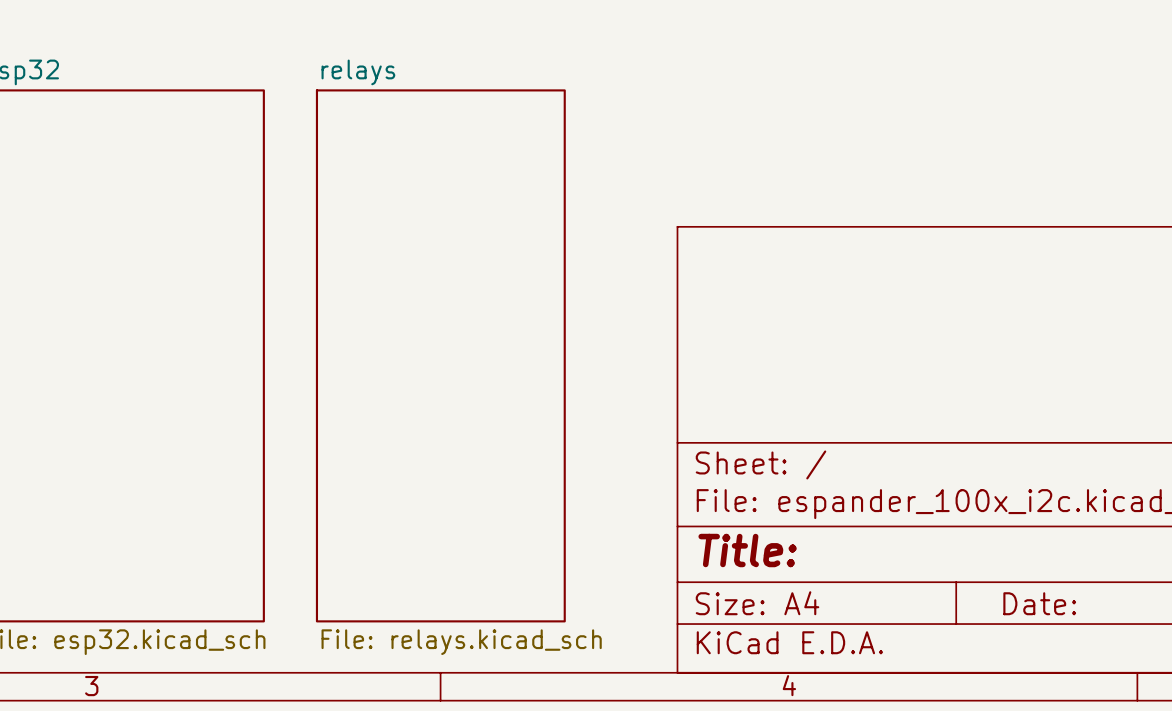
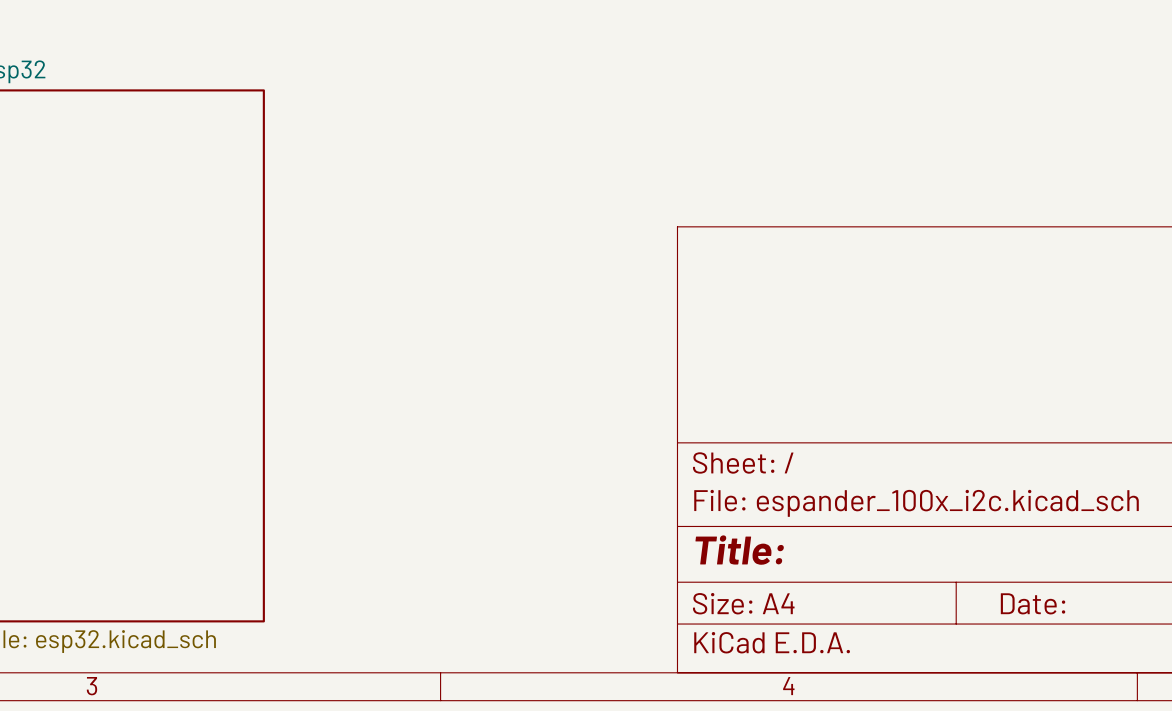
sheet relays: File: relays.kicad_sch (440, 355) -> none

